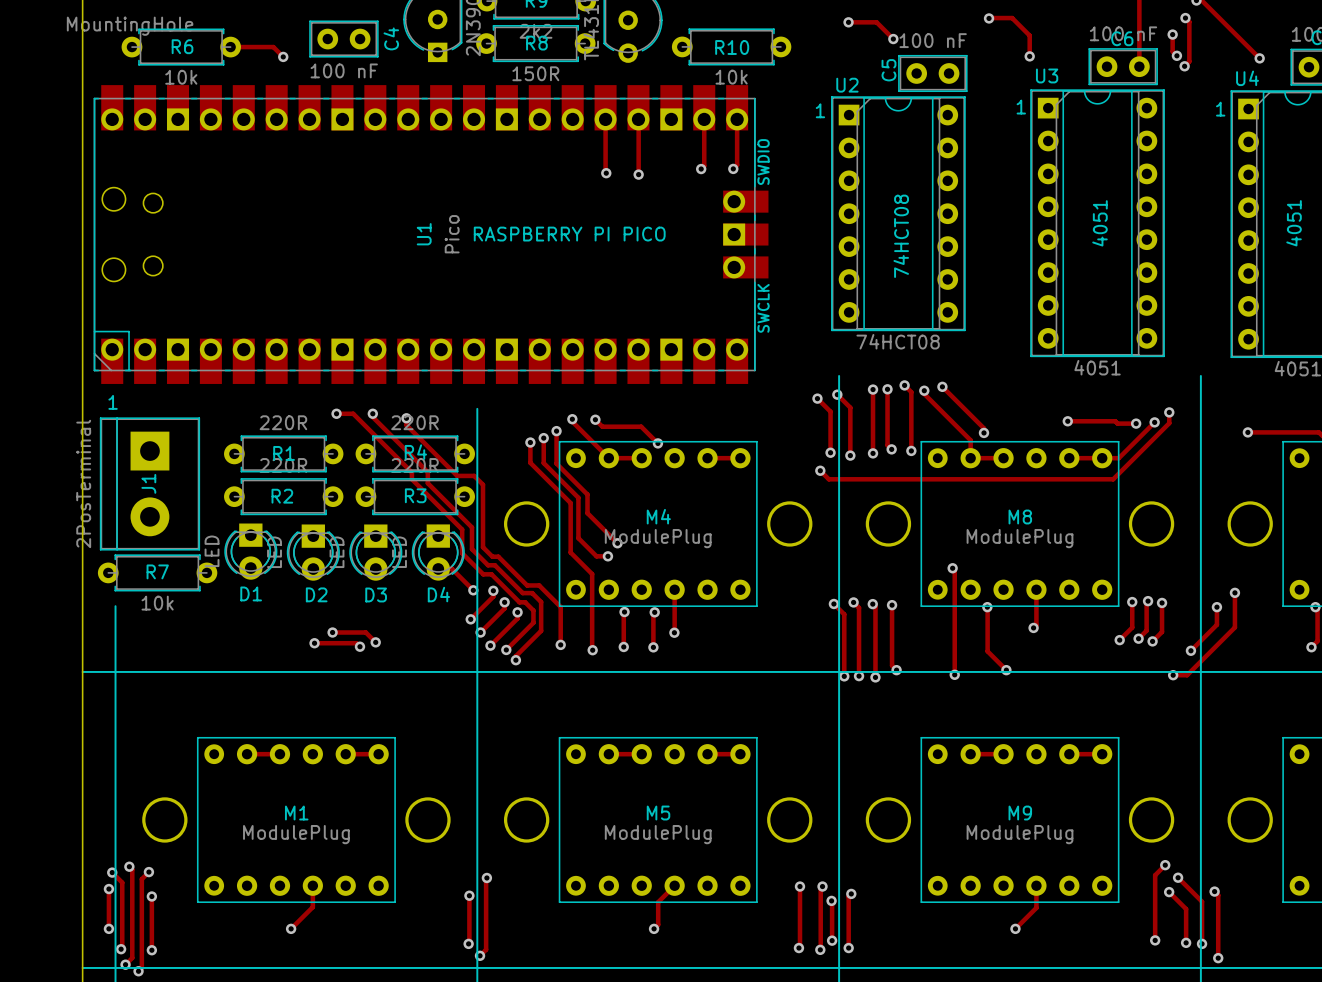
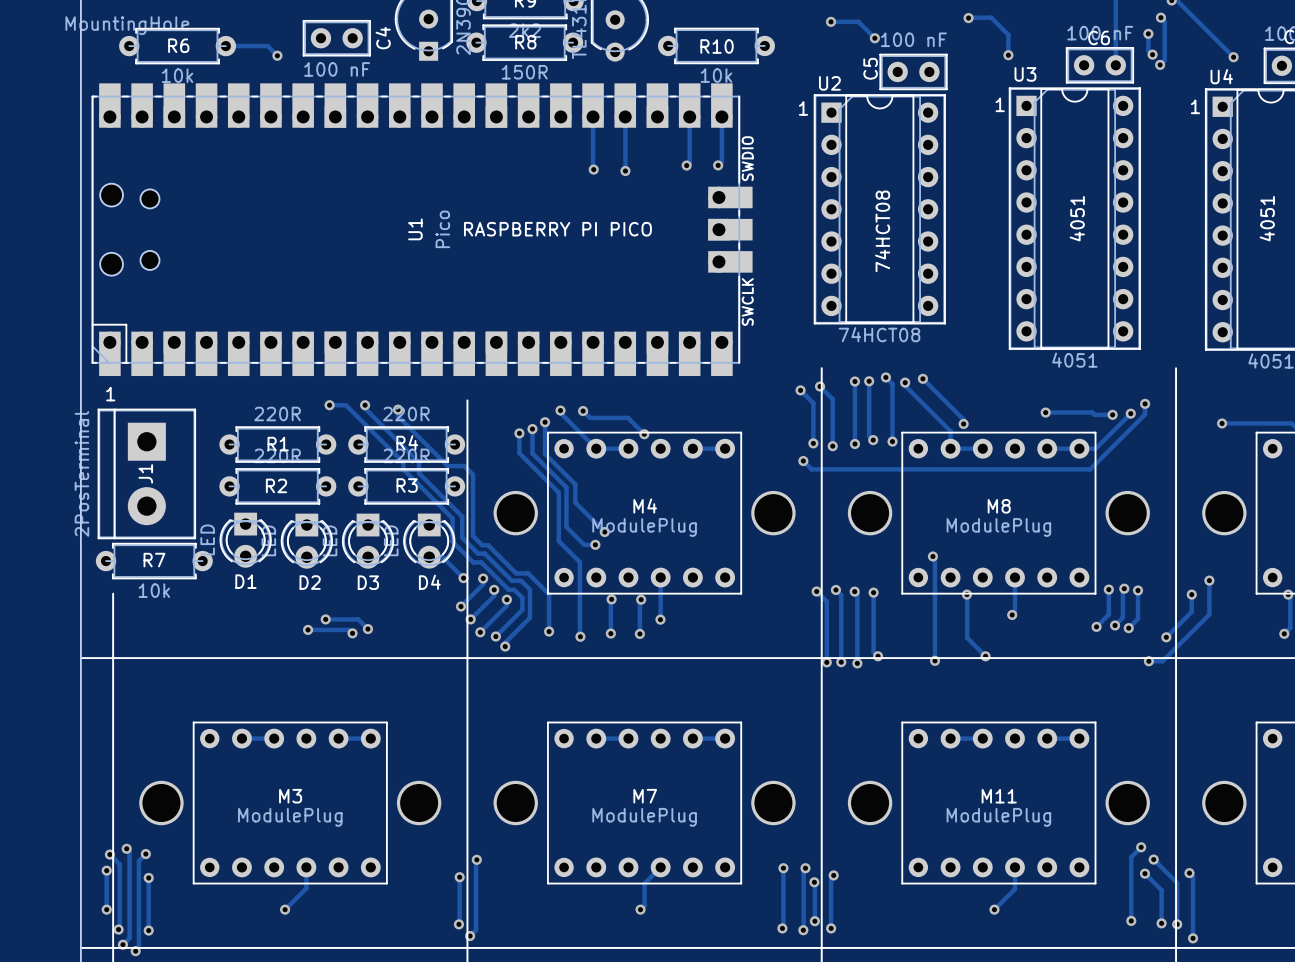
M1 name: M1 (296, 813) -> M3 (290, 796)
M5 name: M5 (658, 813) -> M7 (645, 796)
M9 name: M9 (1020, 813) -> M11 (999, 796)

